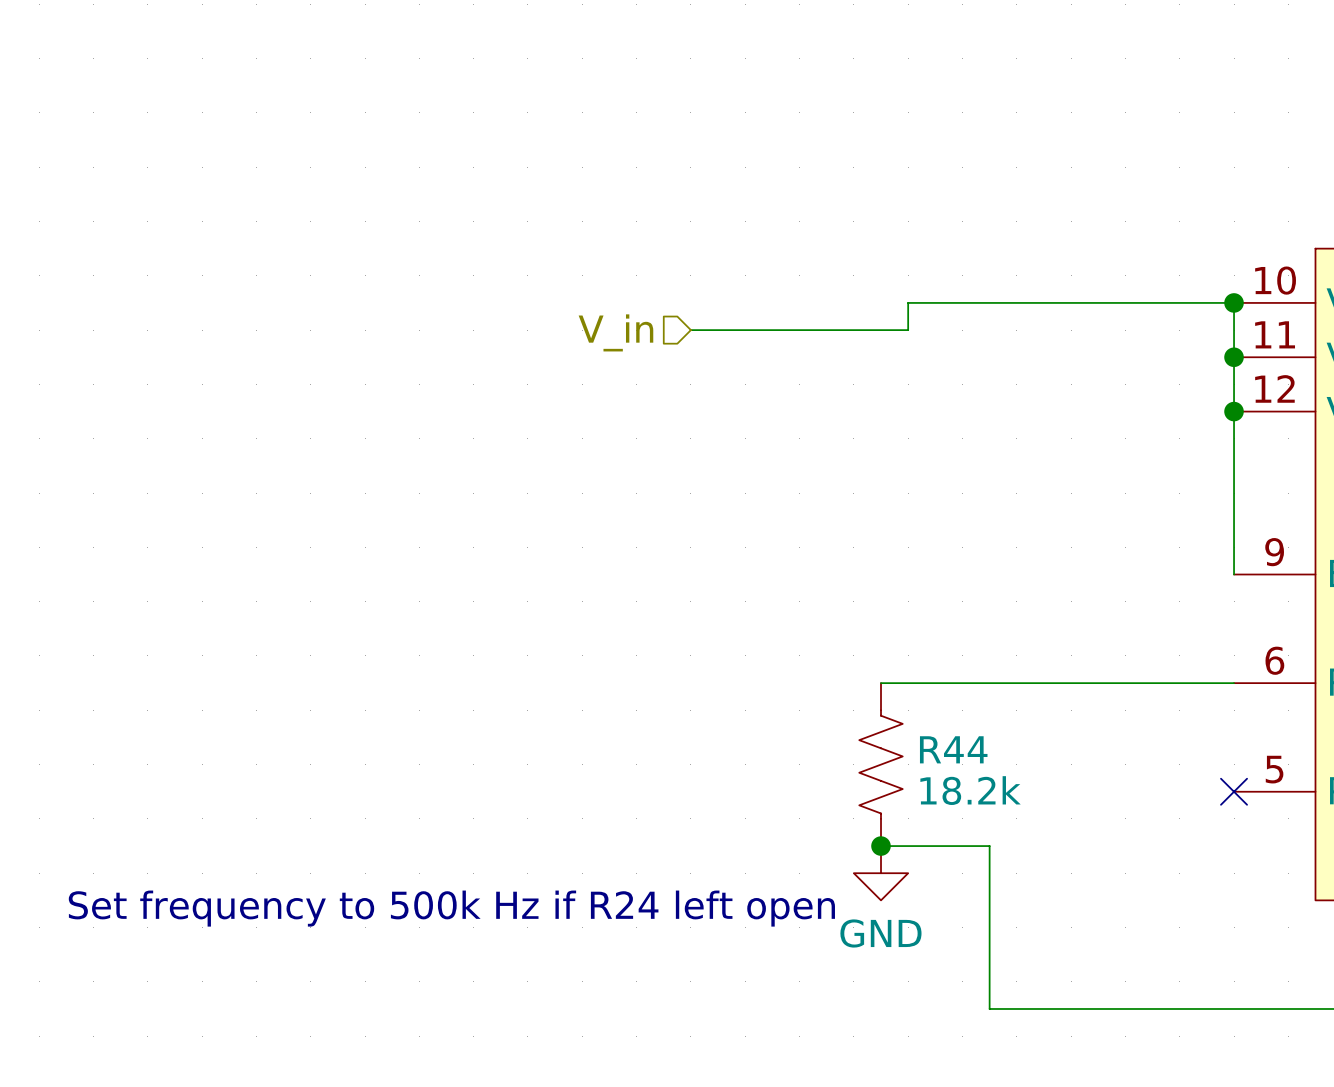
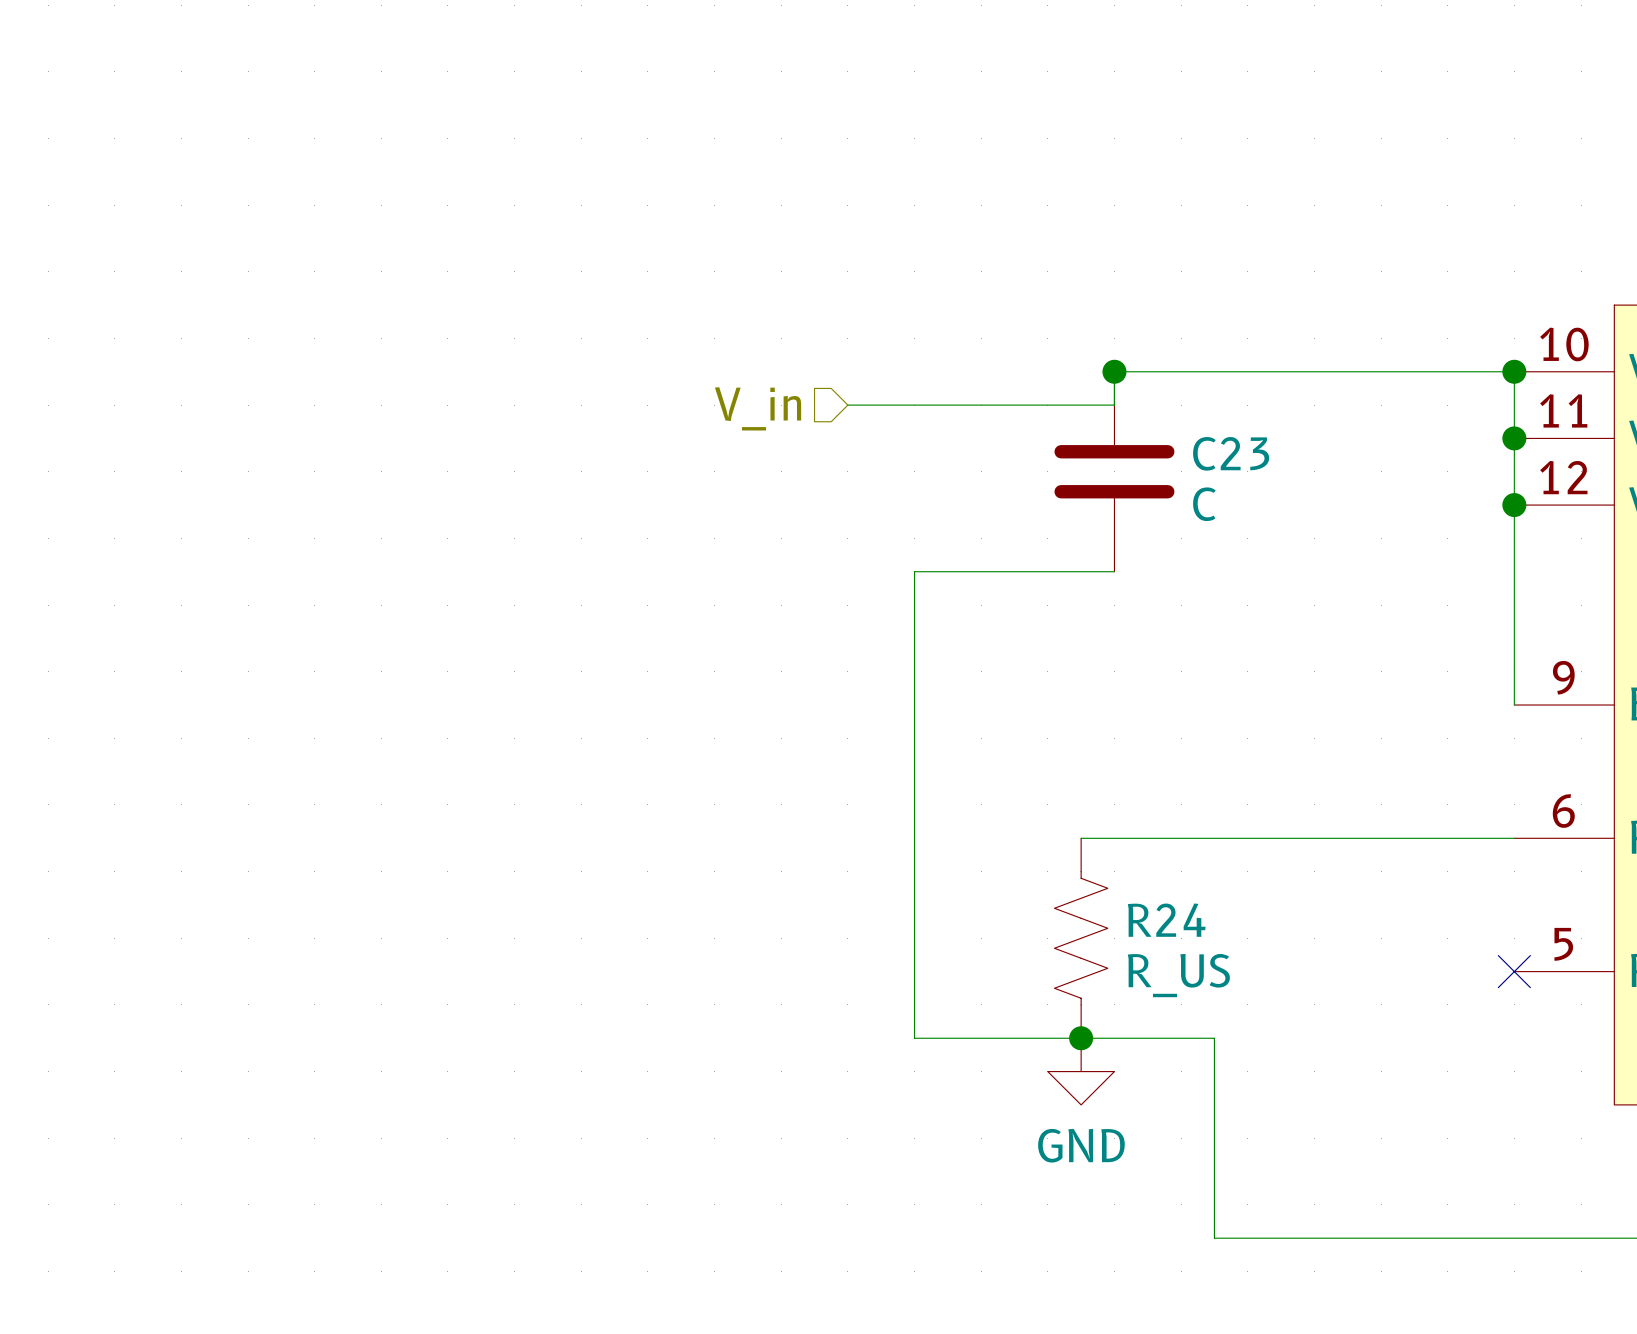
junction: none -> (1114, 371)
C23: none -> C (1114, 471)
wire: none -> (1114, 571) (914, 571) (914, 1038) (1081, 1038)
R44 name: R44 (953, 749) -> R24 (1166, 920)
R44 value: 18.2k (970, 790) -> R_US (1178, 975)
text: Set frequency to 500k Hz if R24 left open (451, 908) -> none

